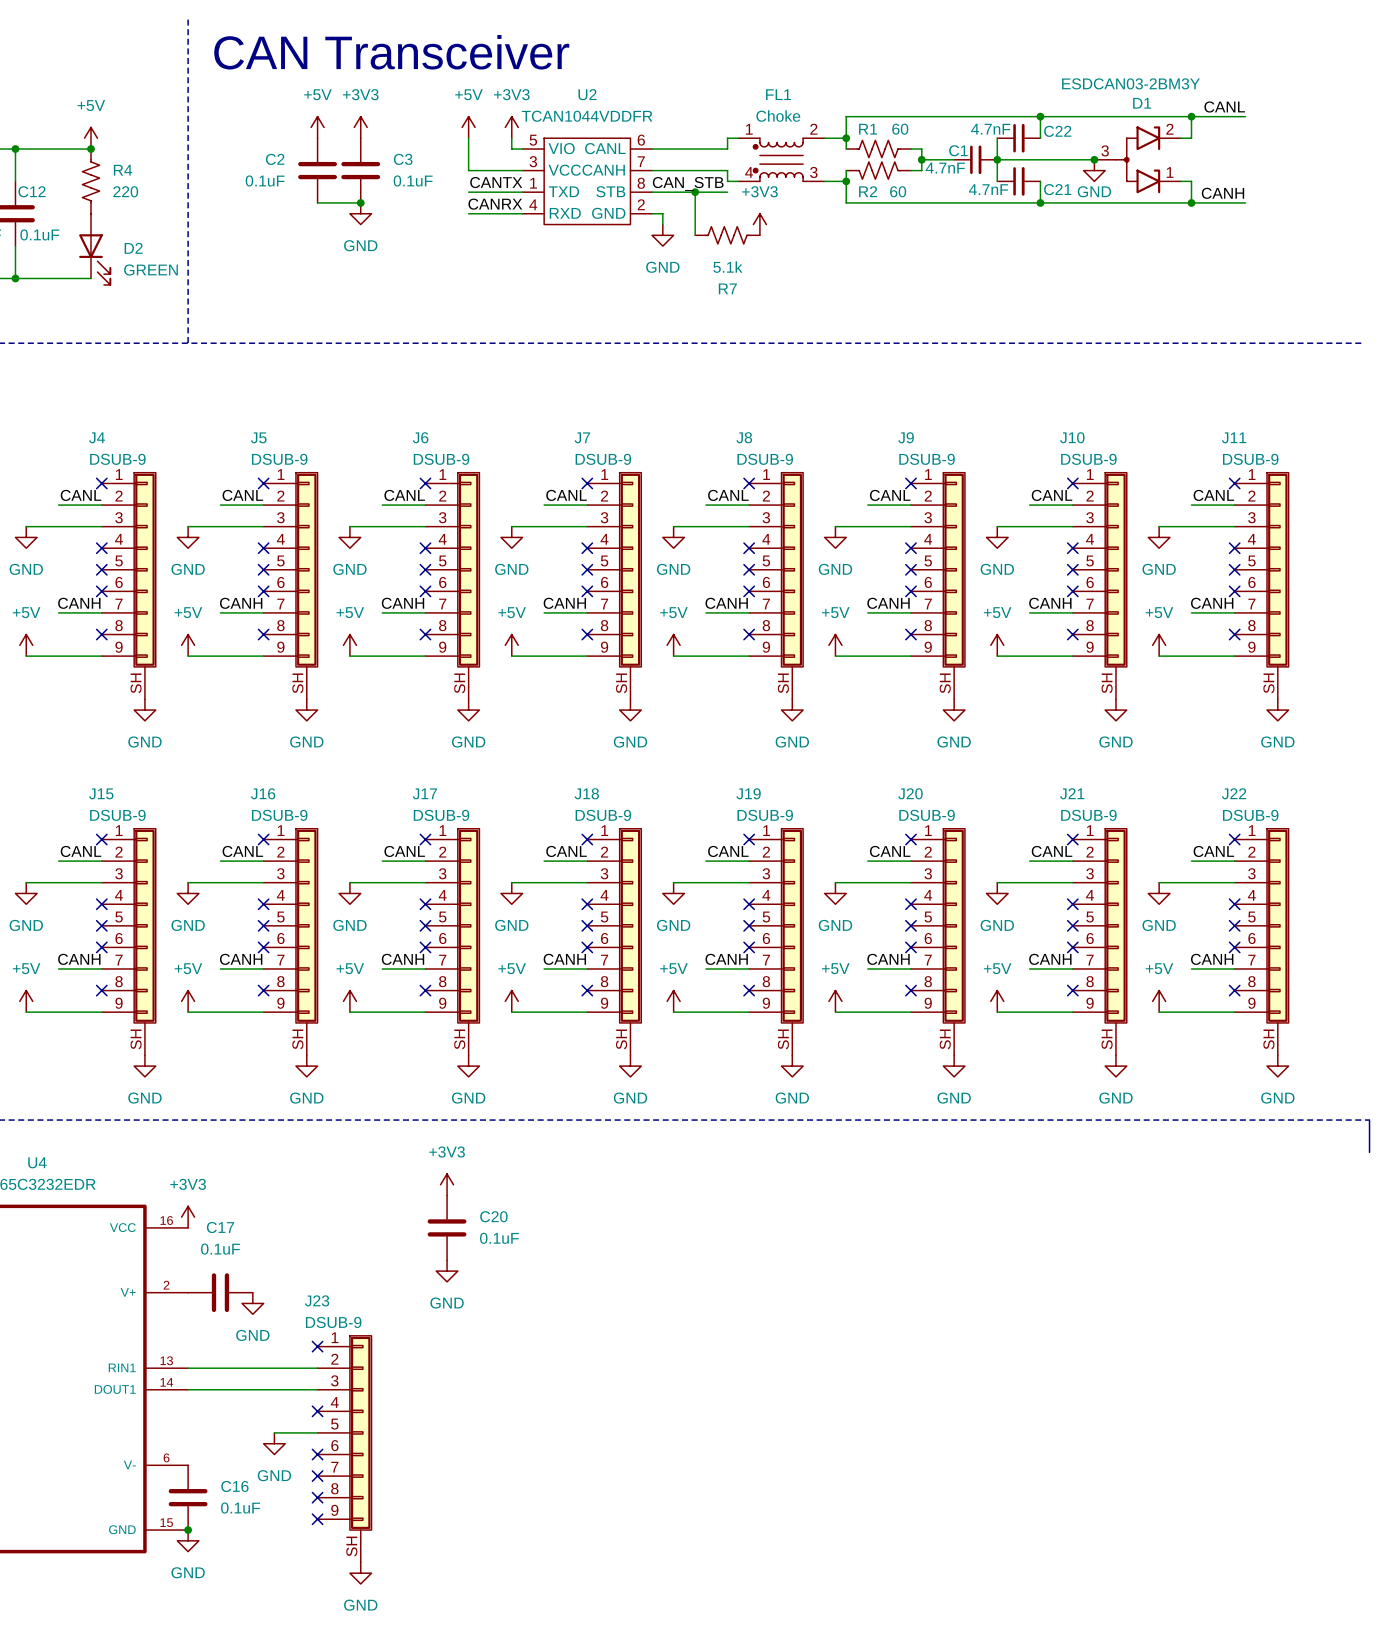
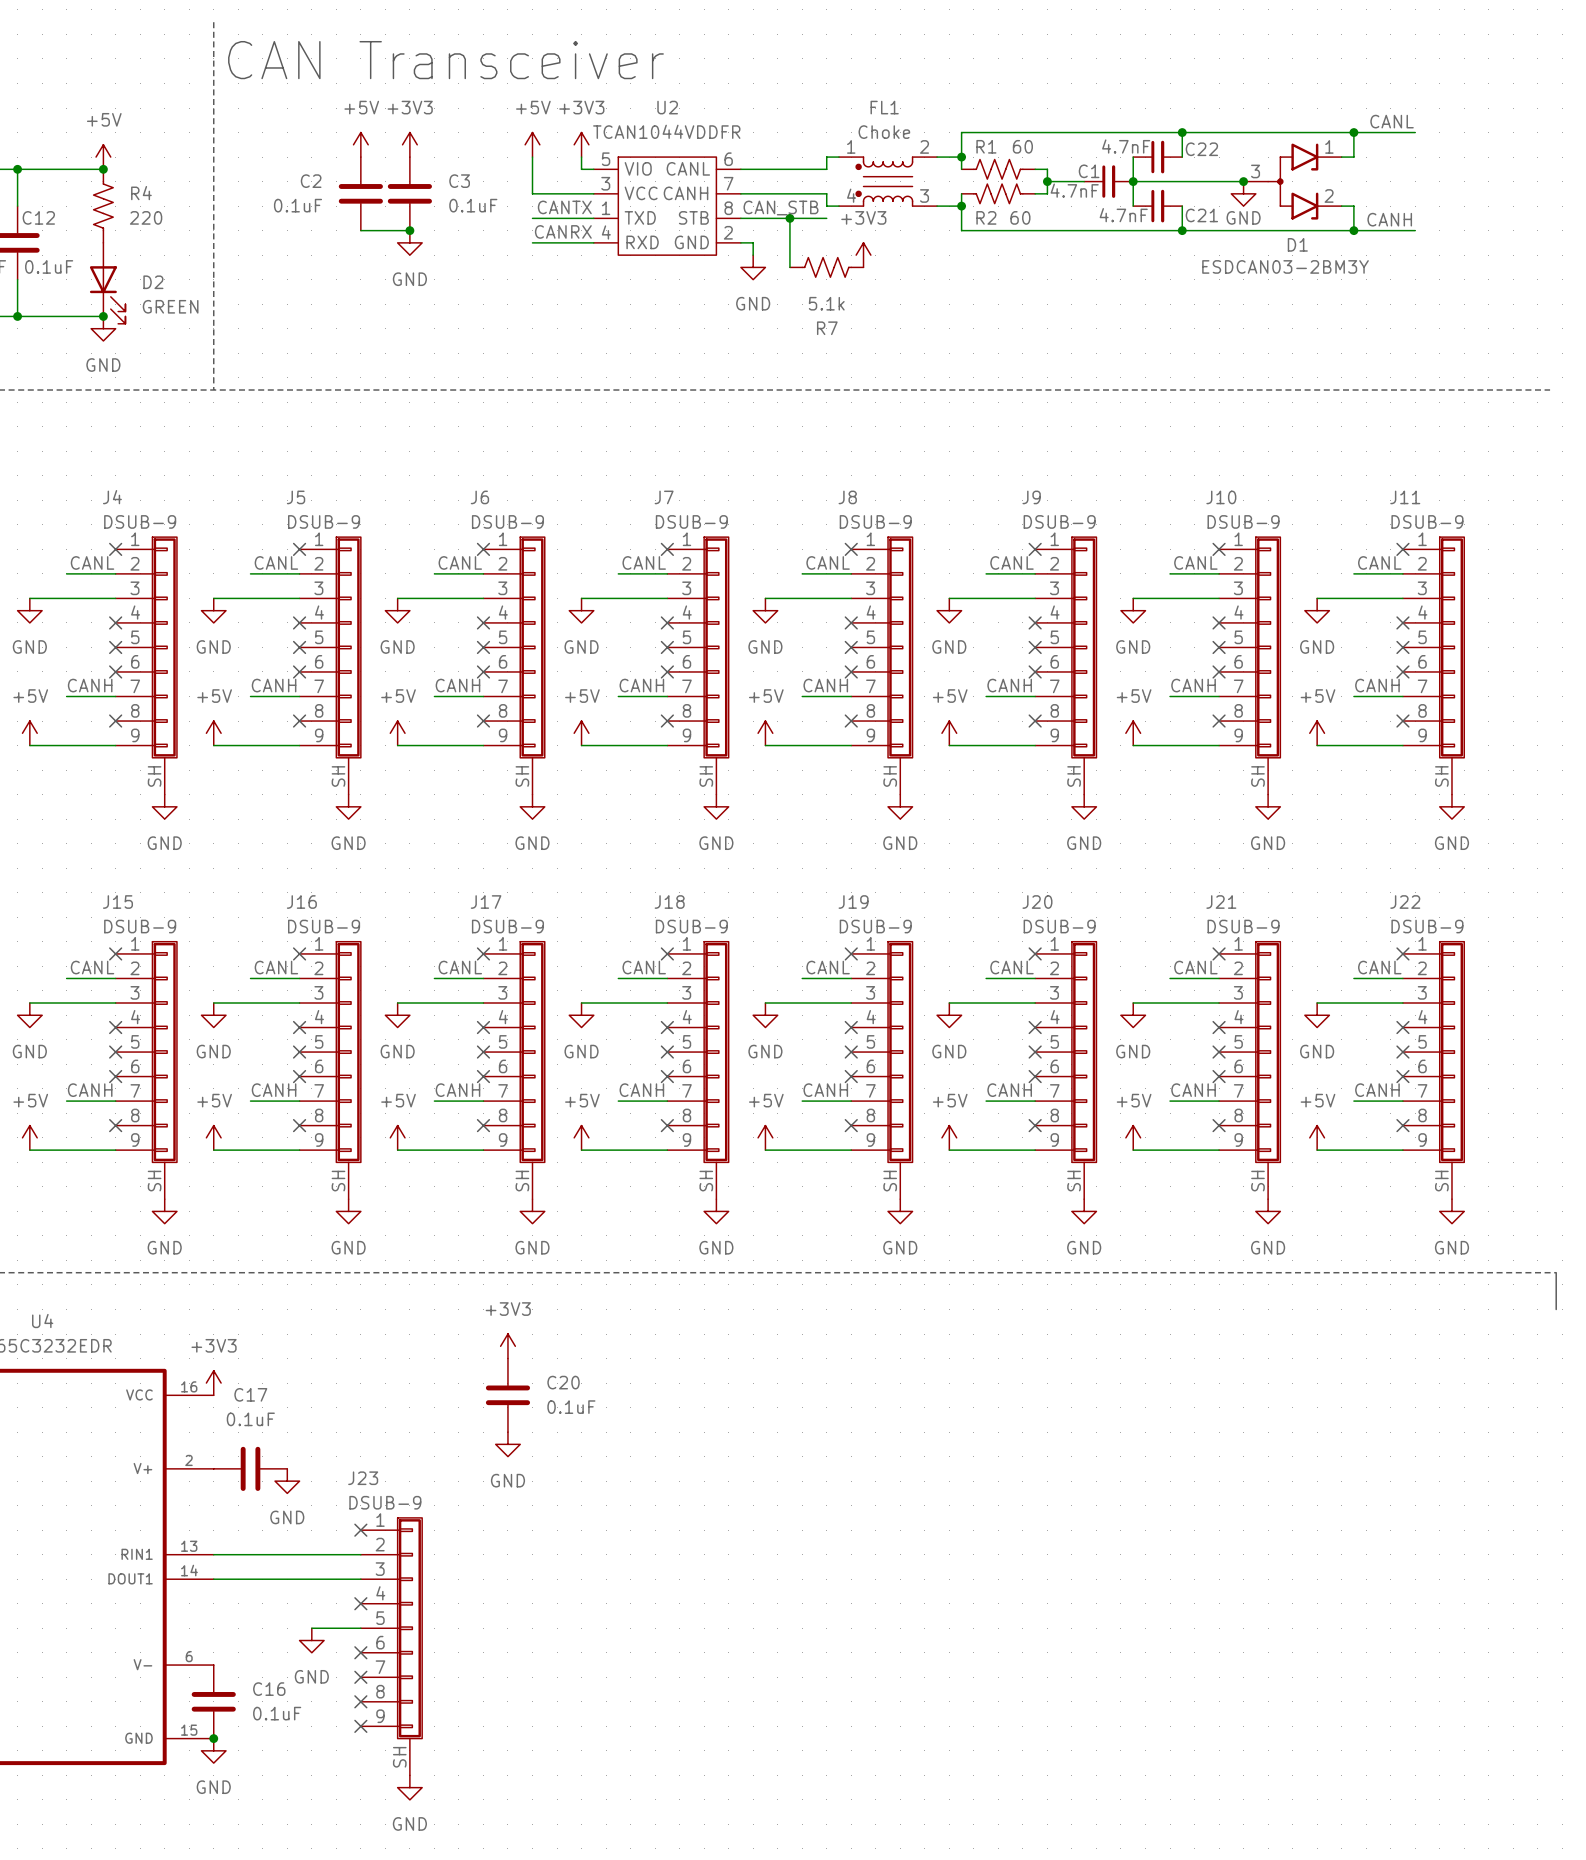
D1 flip: as is (1138, 159) -> up-down (1293, 181)
junction: none -> (103, 316)
power symbol: none -> GND (103, 328)

